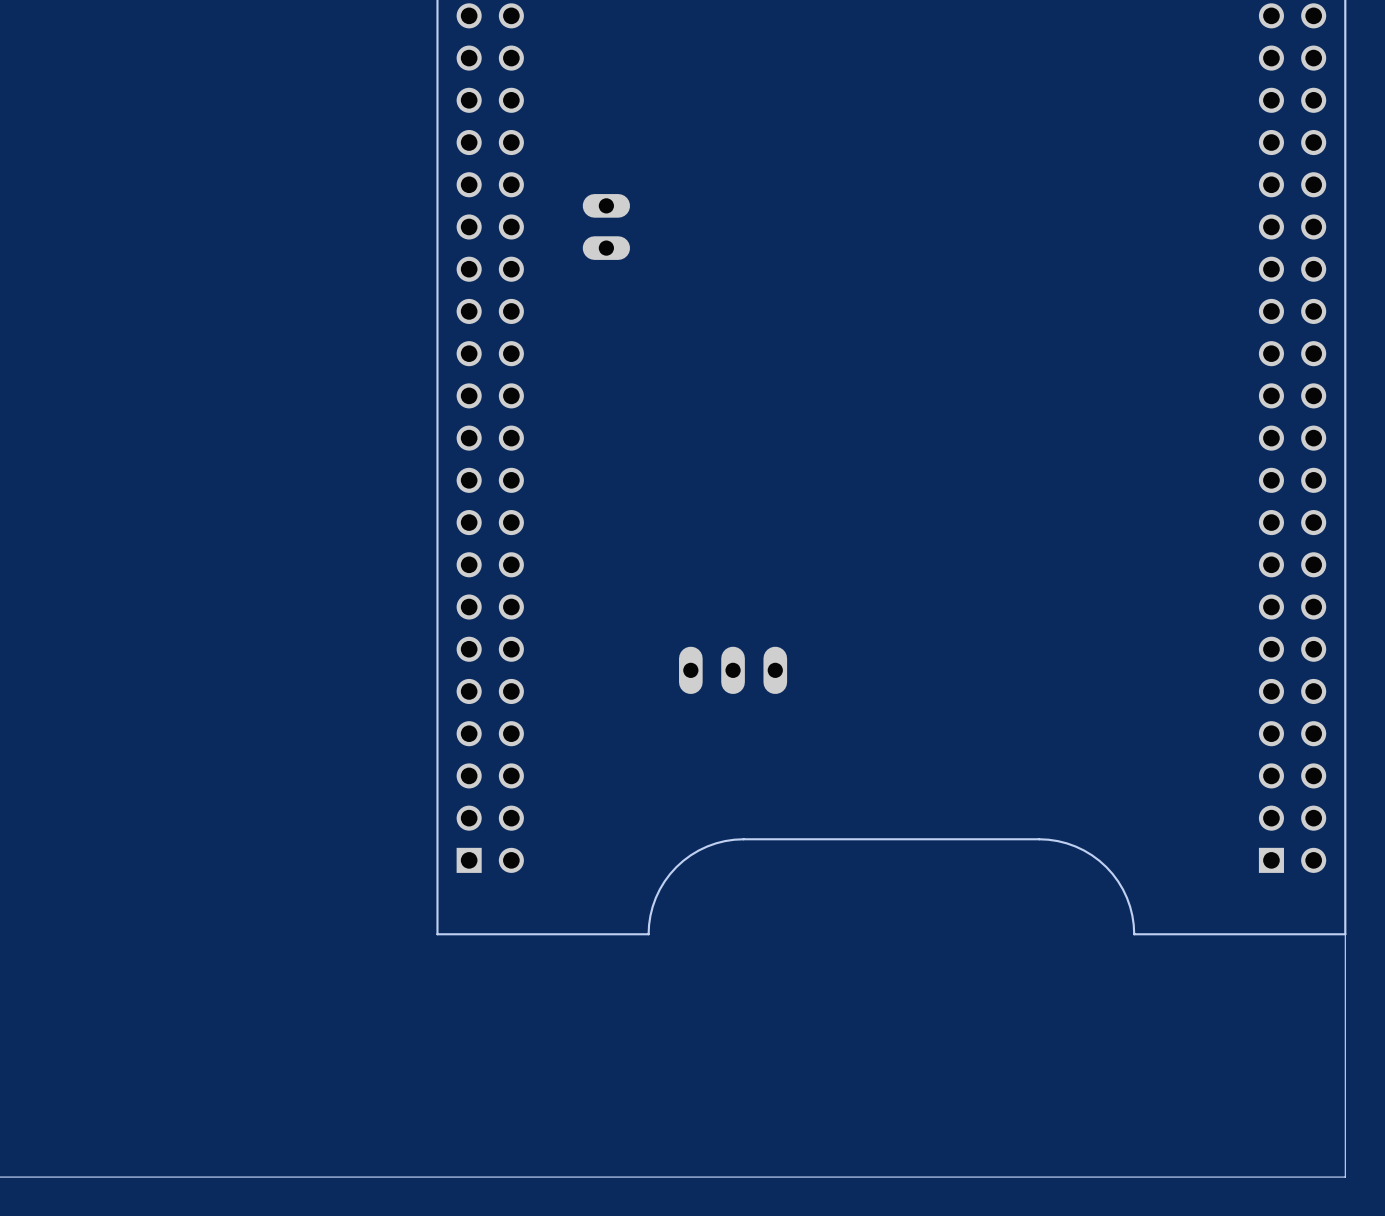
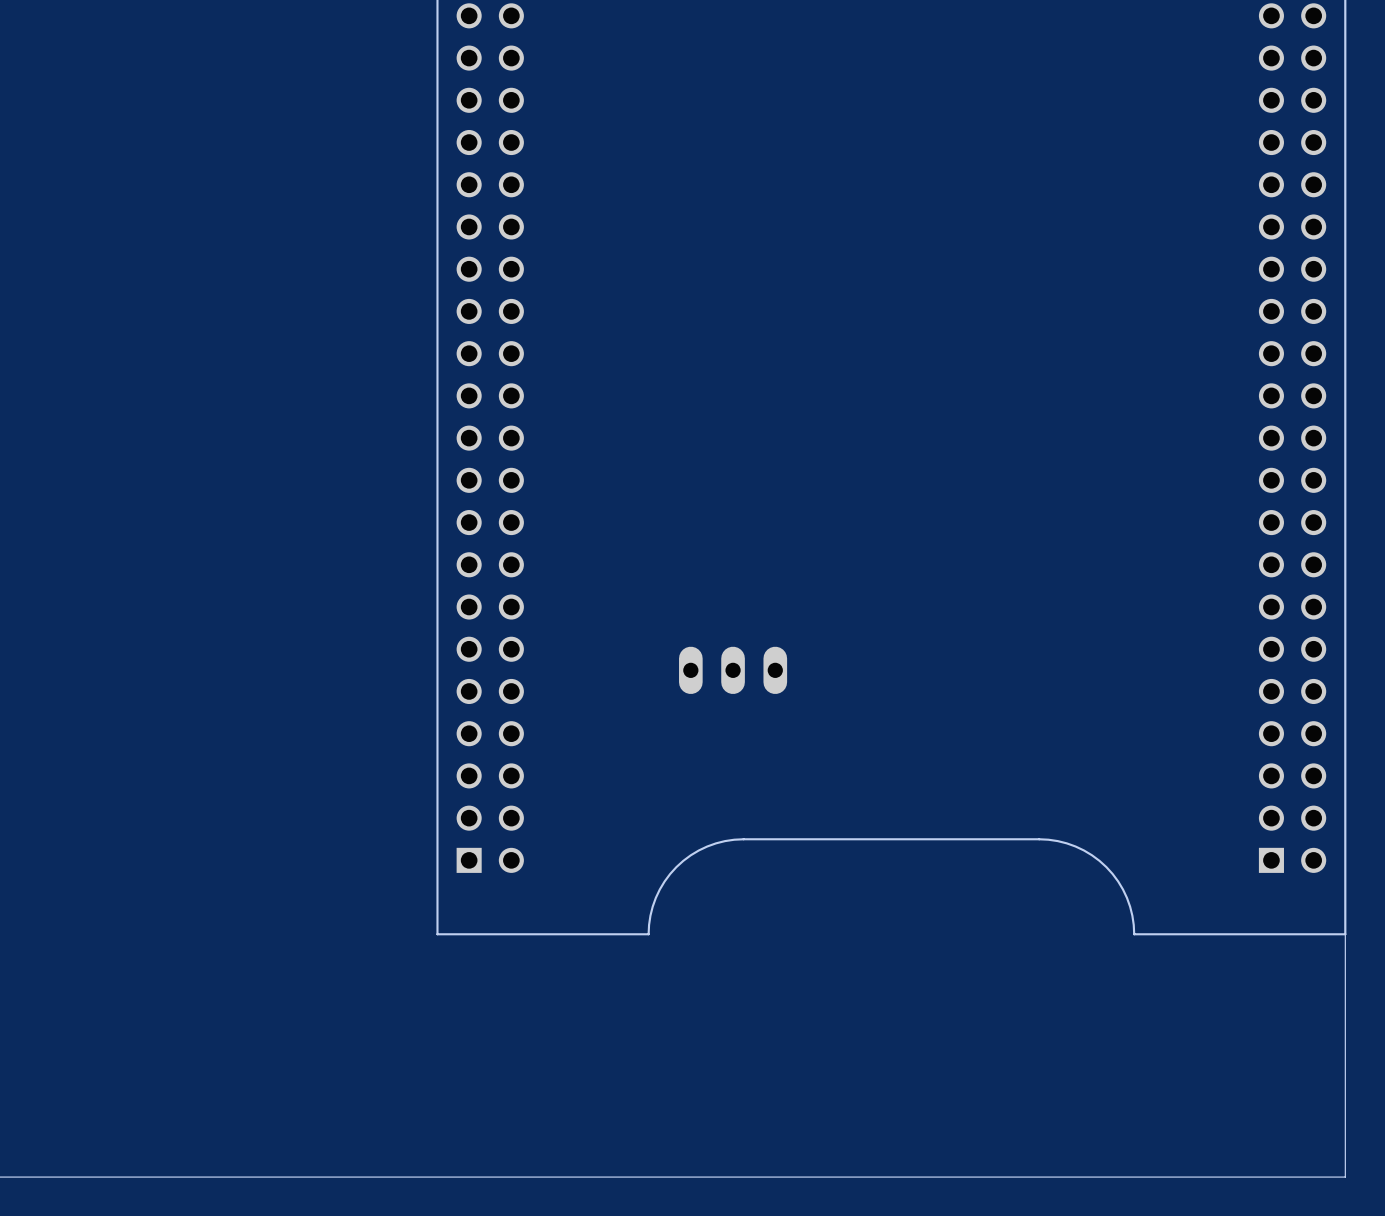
part: (606, 226) -> none

